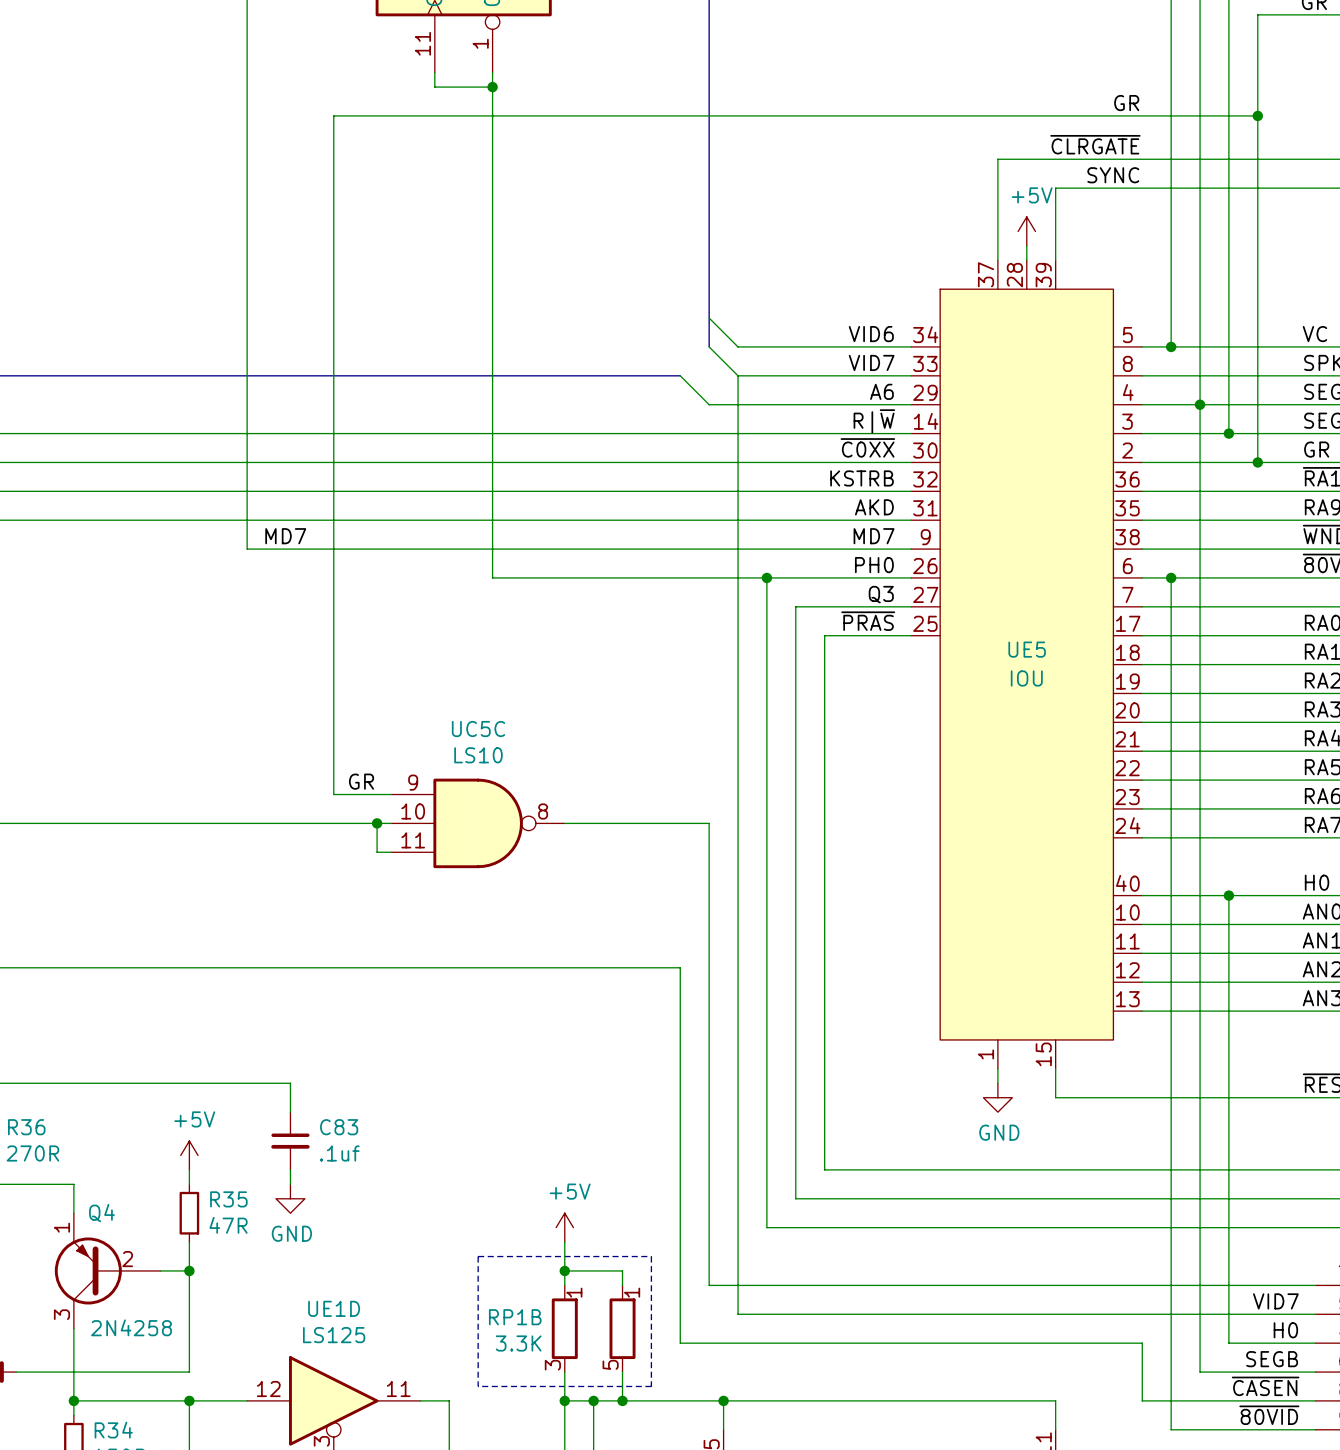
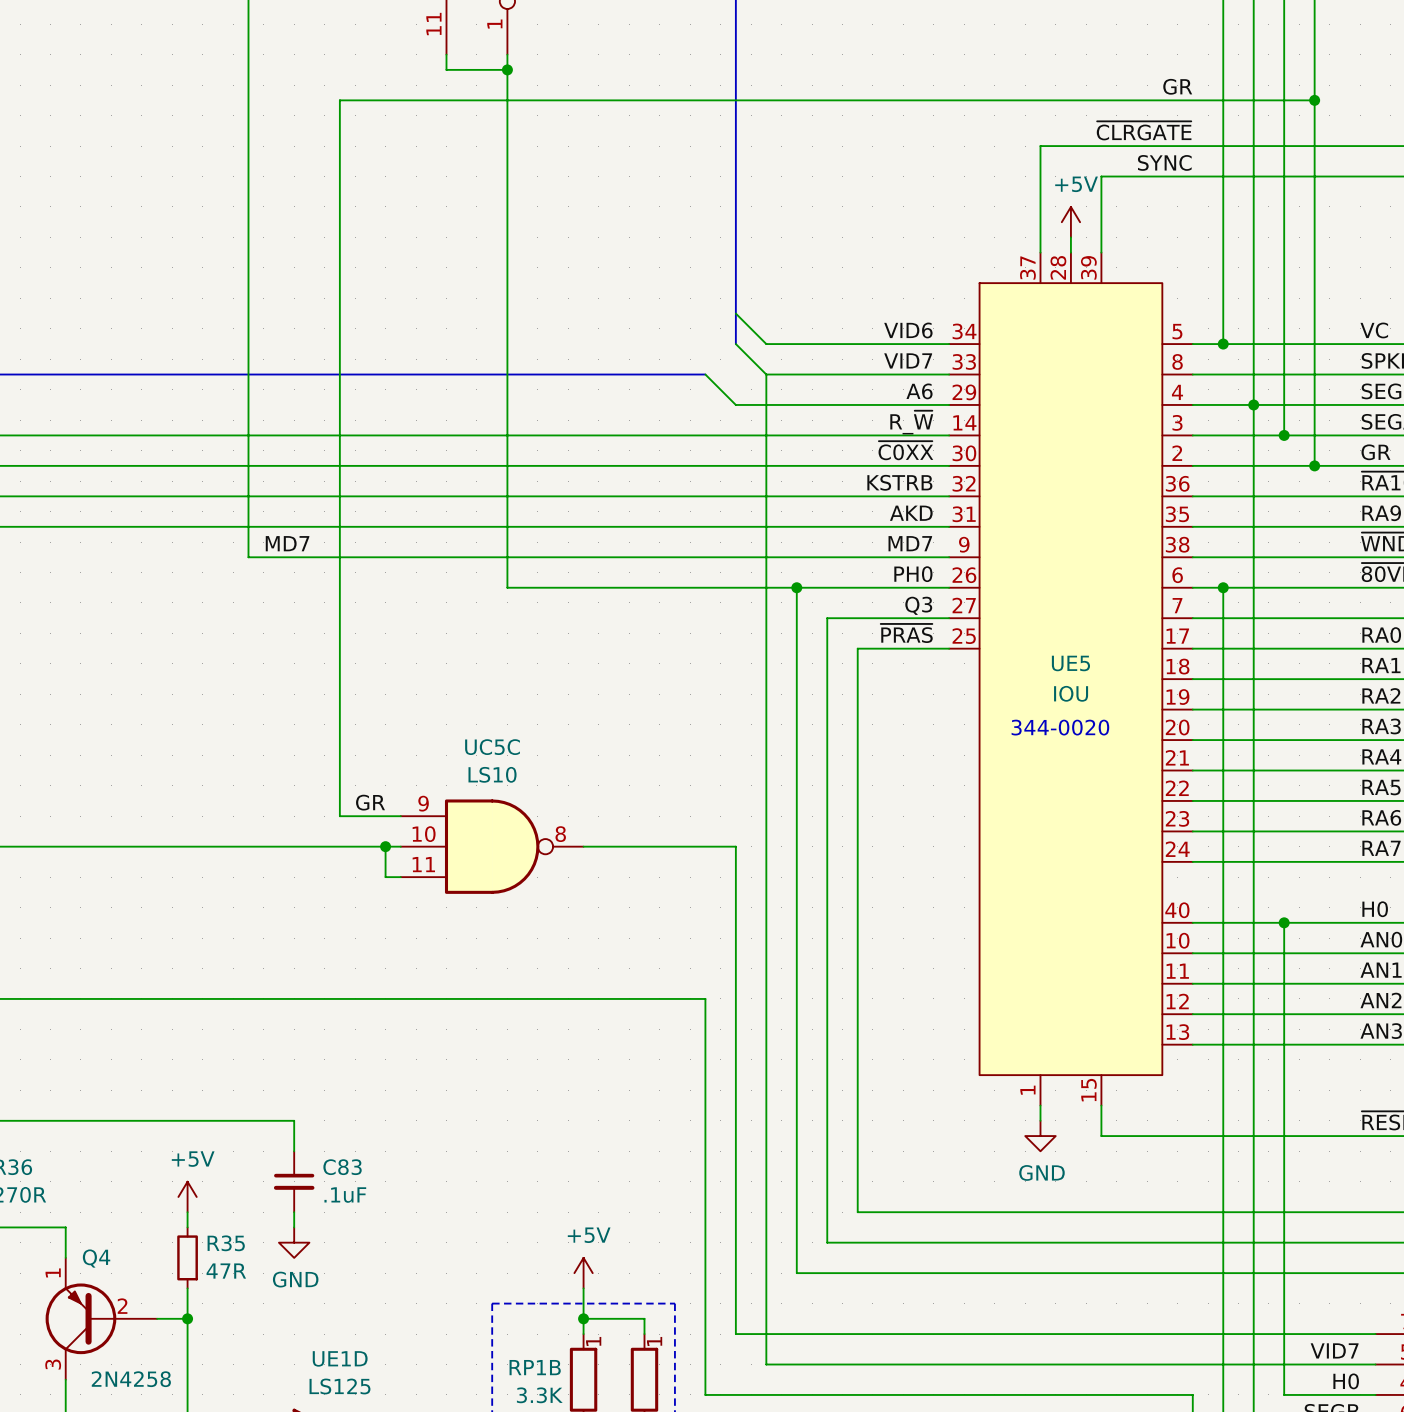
label: R|~{W} (874, 421) -> R_~{W} (911, 422)
text: none -> 344-0020 (1060, 727)
C83 value: .1uf (339, 1153) -> .1uF (345, 1195)

